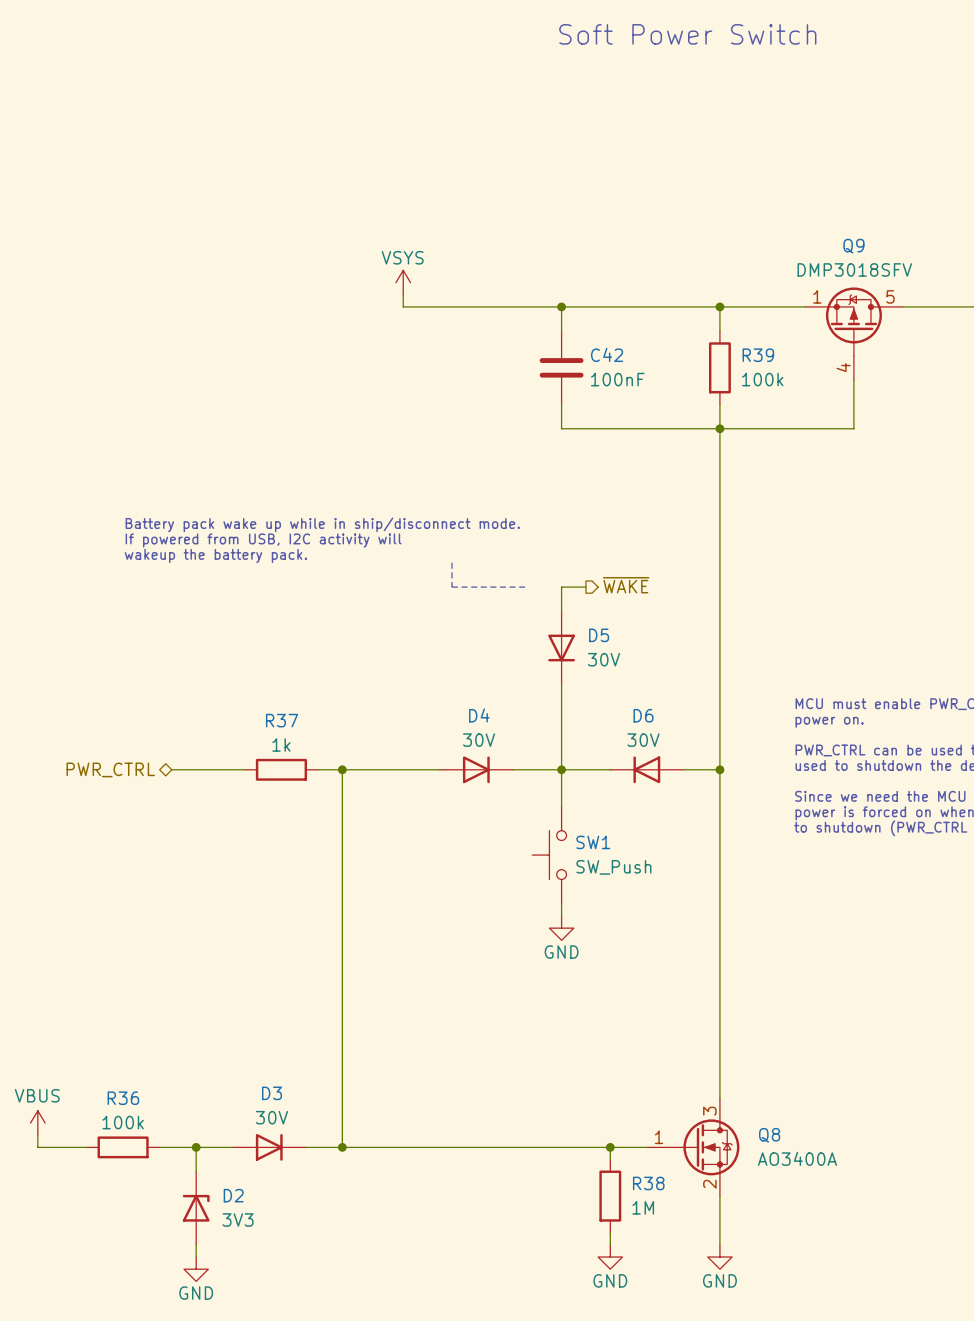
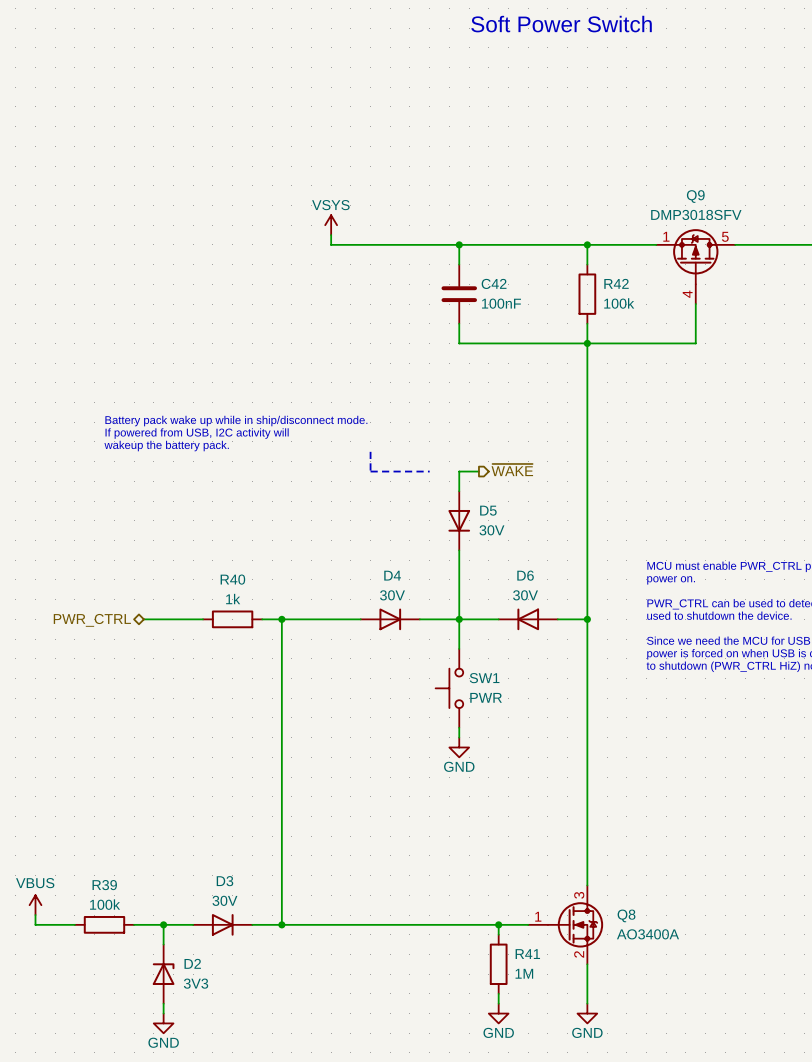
R39 name: R39 (758, 355) -> R42 (616, 283)
R37 name: R37 (282, 720) -> R40 (232, 579)
SW1 value: SW_Push (613, 867) -> PWR (486, 697)
R36 name: R36 (123, 1098) -> R39 (104, 885)
R38 name: R38 (648, 1183) -> R41 (527, 954)

